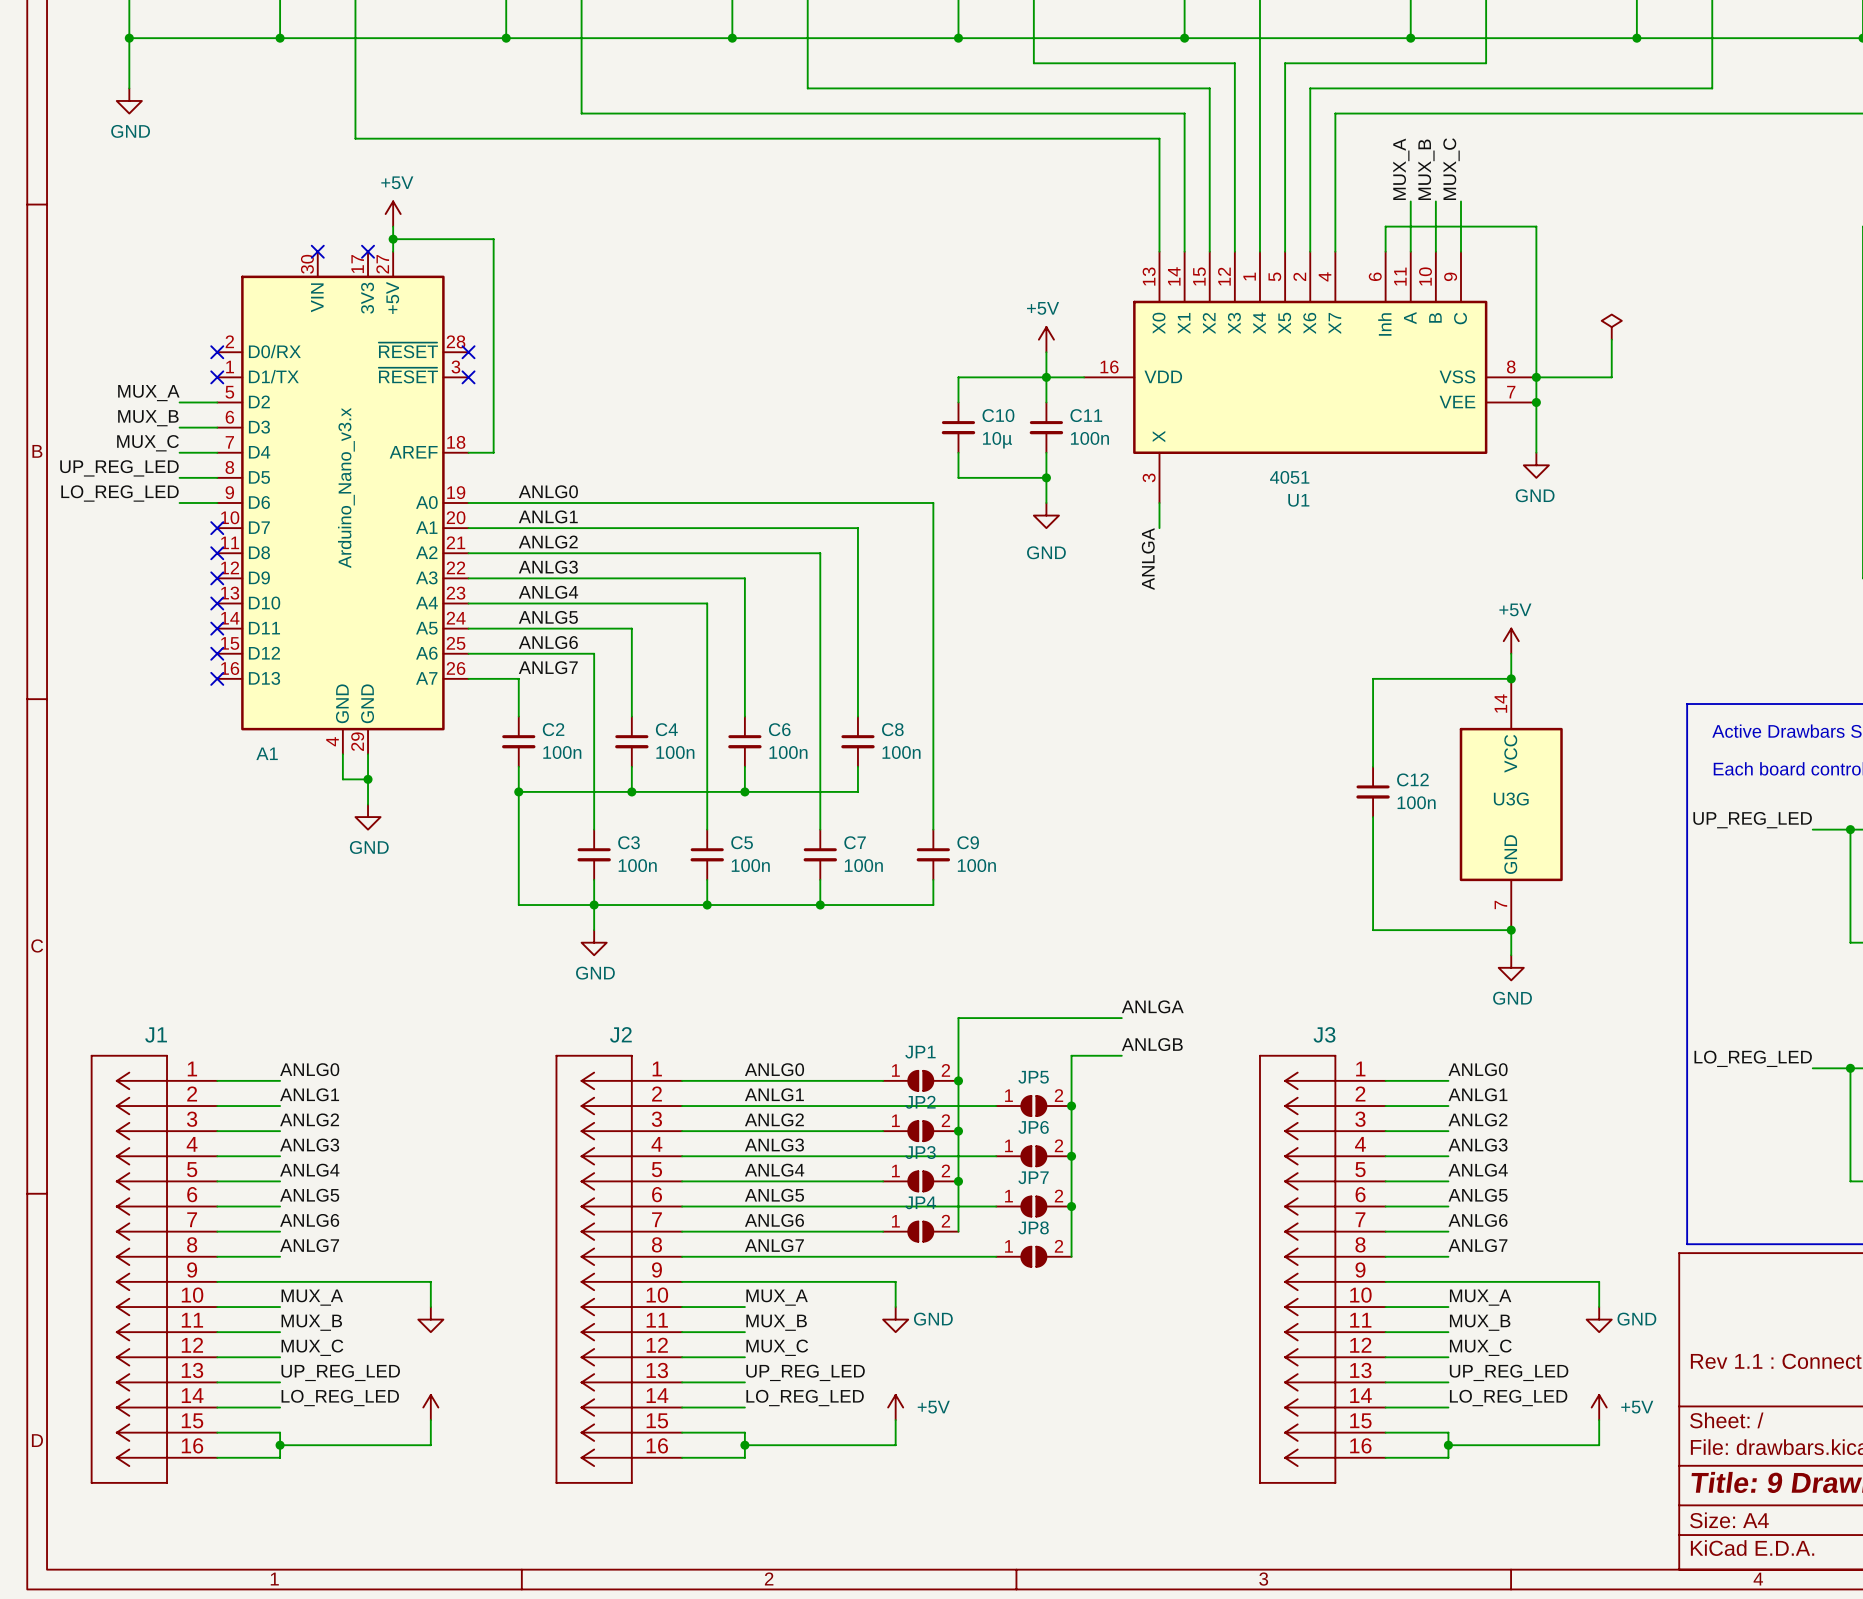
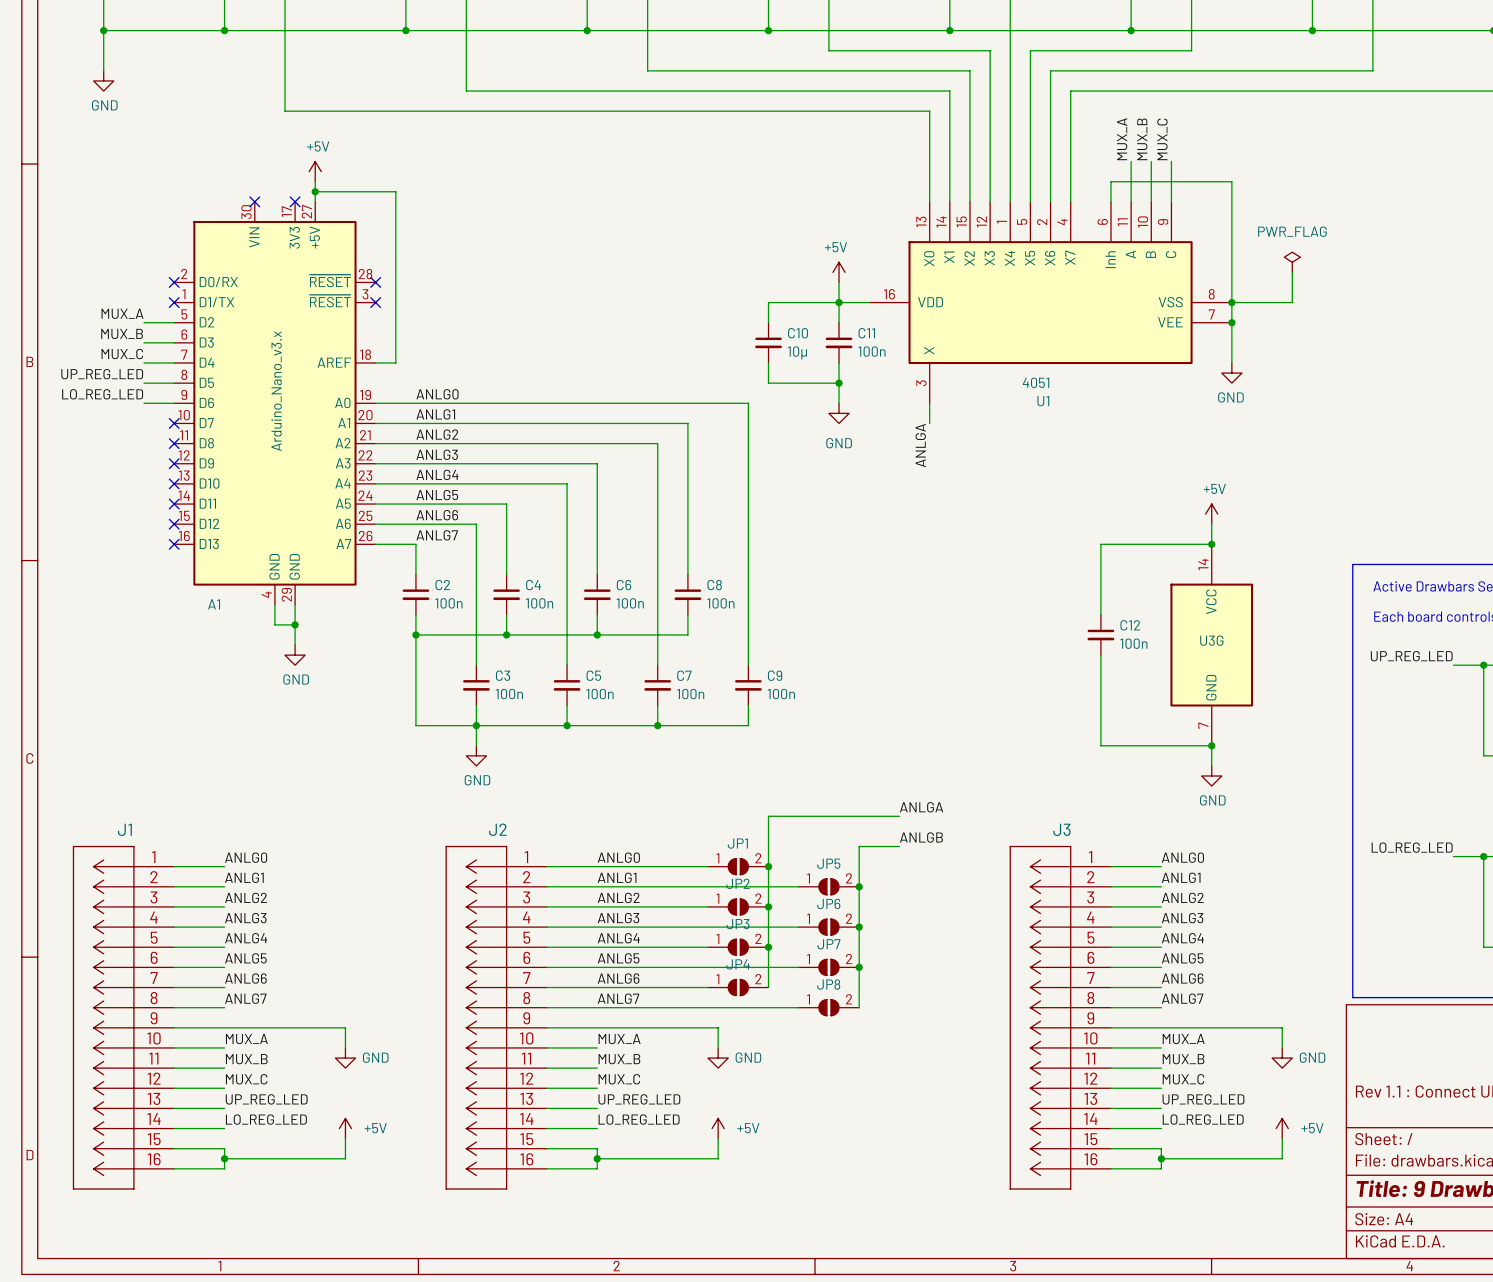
power symbol text: none -> PWR_FLAG (1292, 231)
power symbol text: none -> GND (375, 1057)
power symbol text: none -> +5V (375, 1128)

